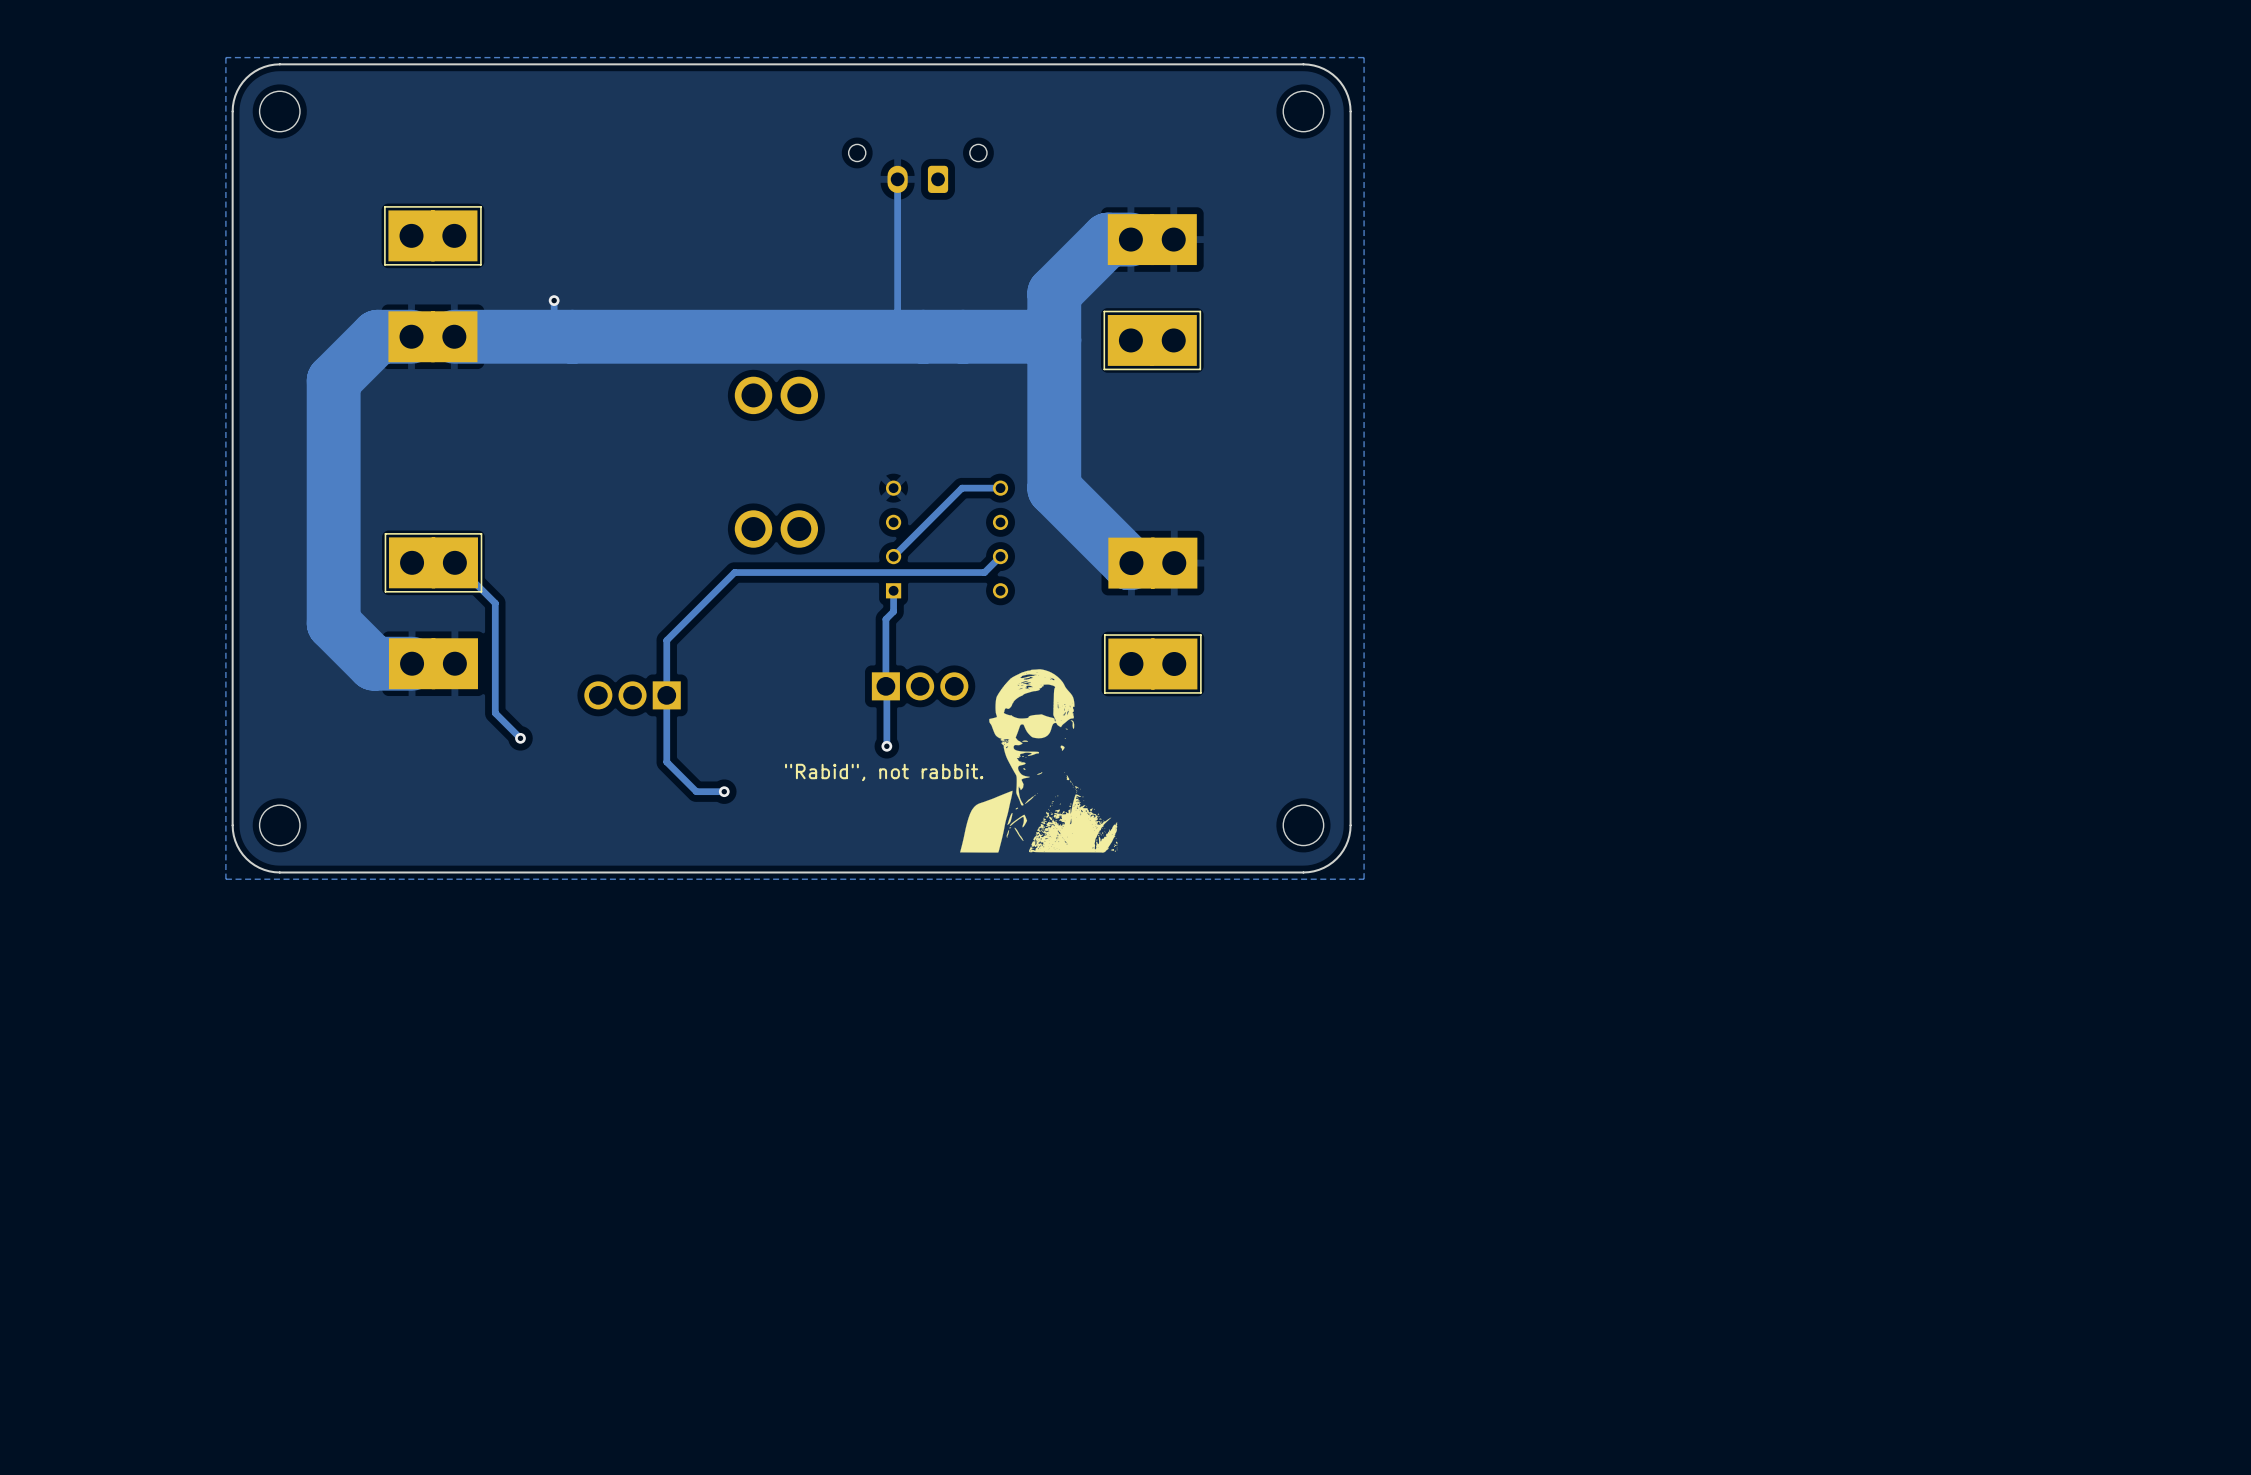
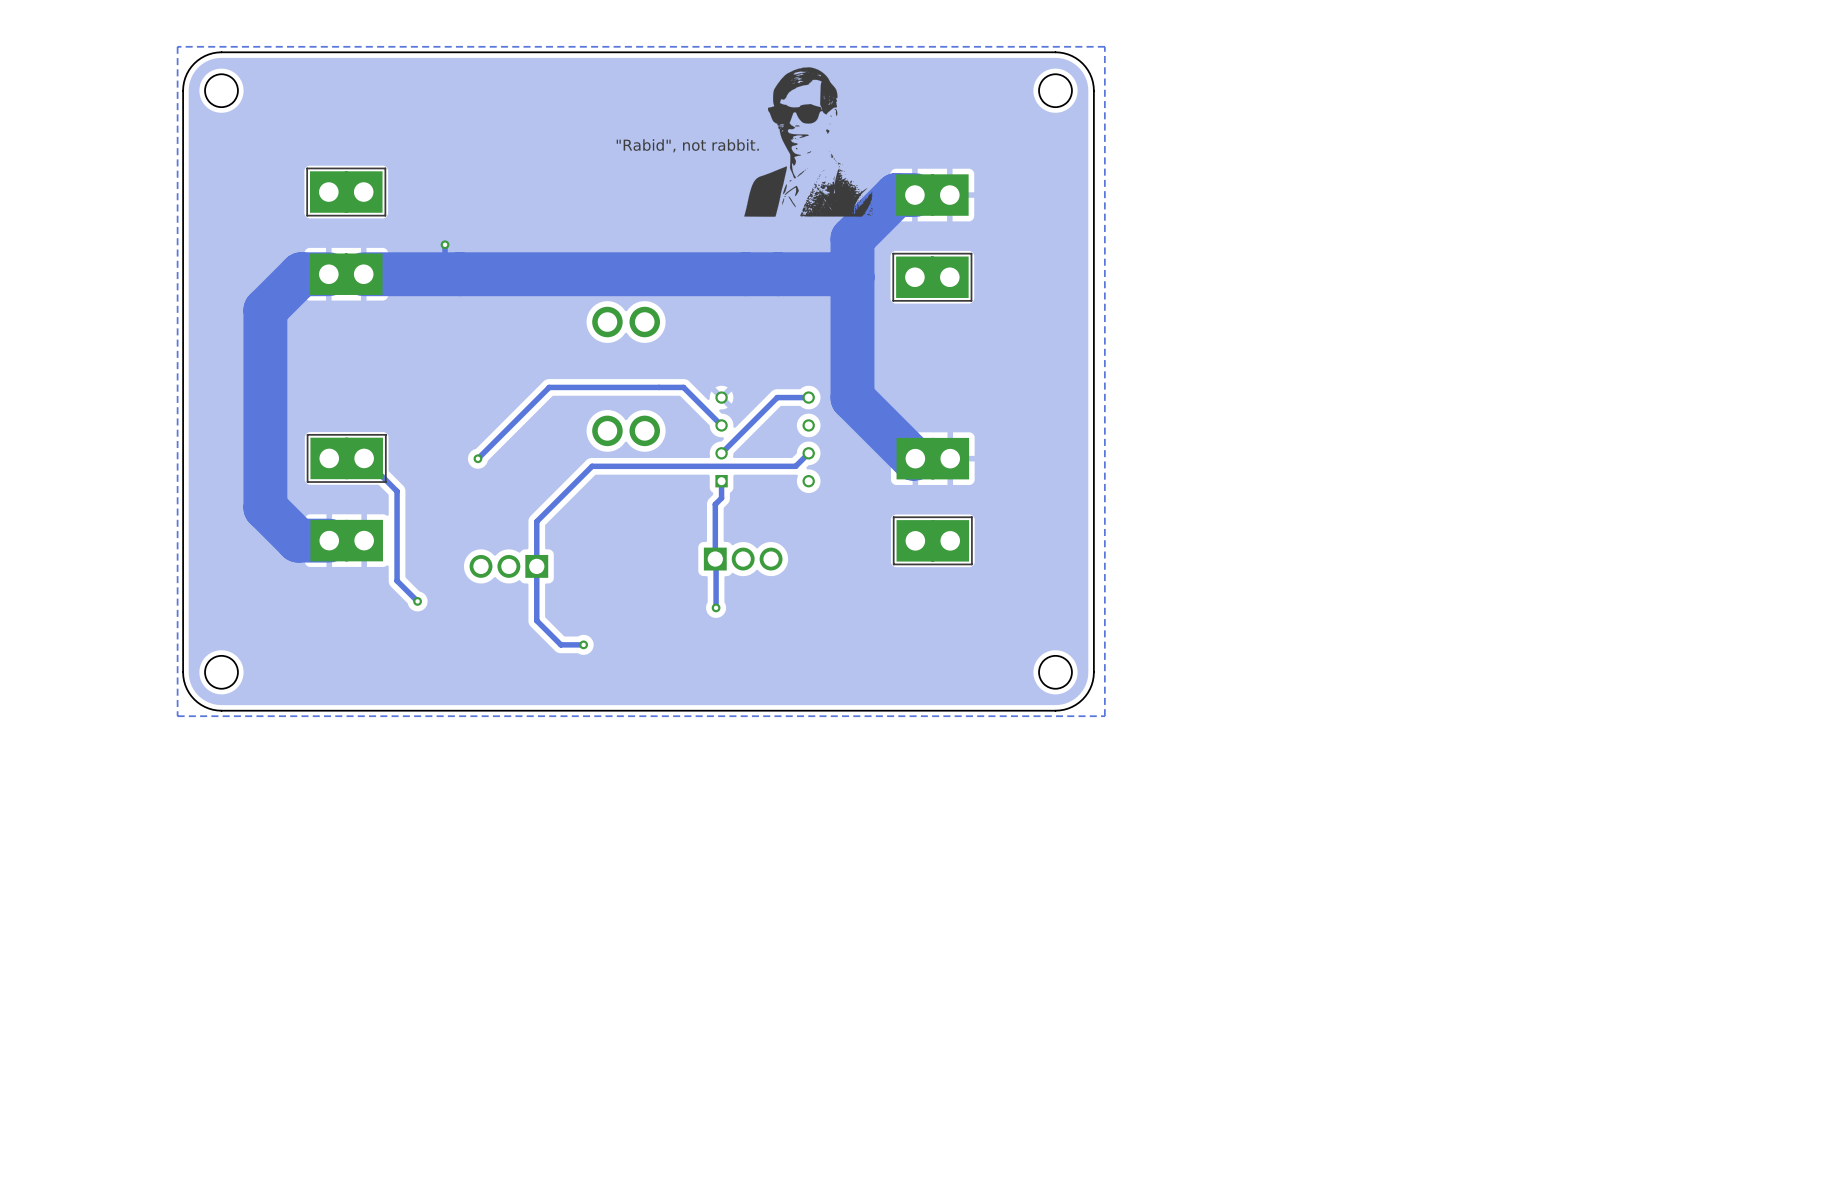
drawing: none -> [744, 67, 873, 217]
part: (917, 168) -> none
text: none -> "Rabid", not rabbit. (687, 145)
track: (897, 179) (897, 311) (923, 336) -> none
track: none -> (721, 425) (683, 387) (549, 387) (477, 458)
via: none -> (477, 458)
drawing: [960, 669, 1118, 853] -> none
text: "Rabid", not rabbit. (884, 772) -> none

